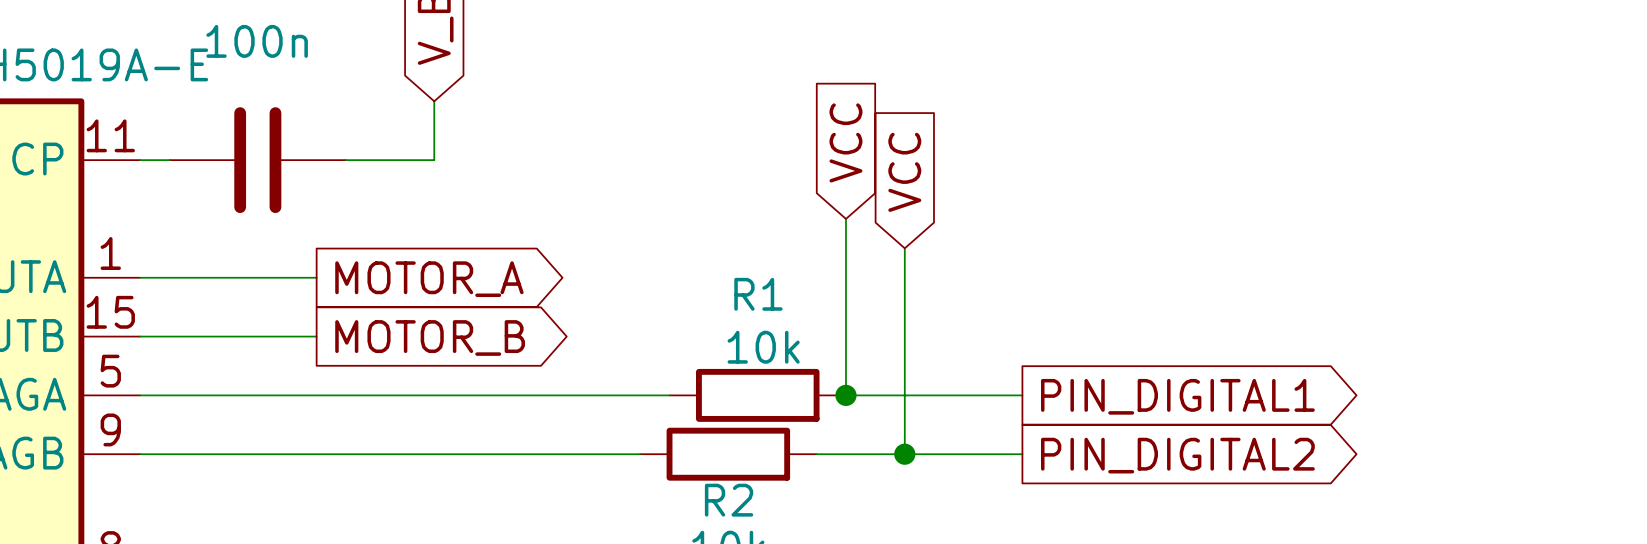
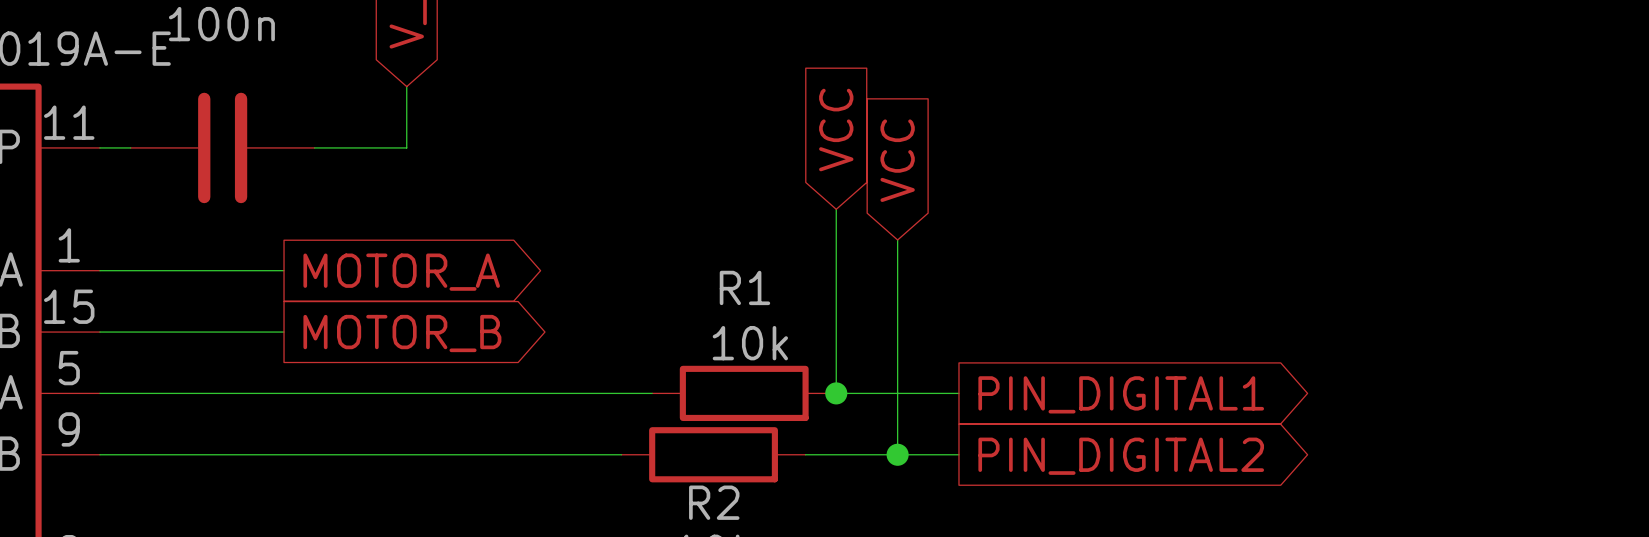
wire: (963, 395) (1022, 395) -> none
global label position: PIN_DIGITAL1 (1177, 396) -> PIN_DIGITAL1 (1121, 394)
wire: (963, 454) (1022, 454) -> none
global label position: PIN_DIGITAL2 (1177, 455) -> PIN_DIGITAL2 (1121, 456)

